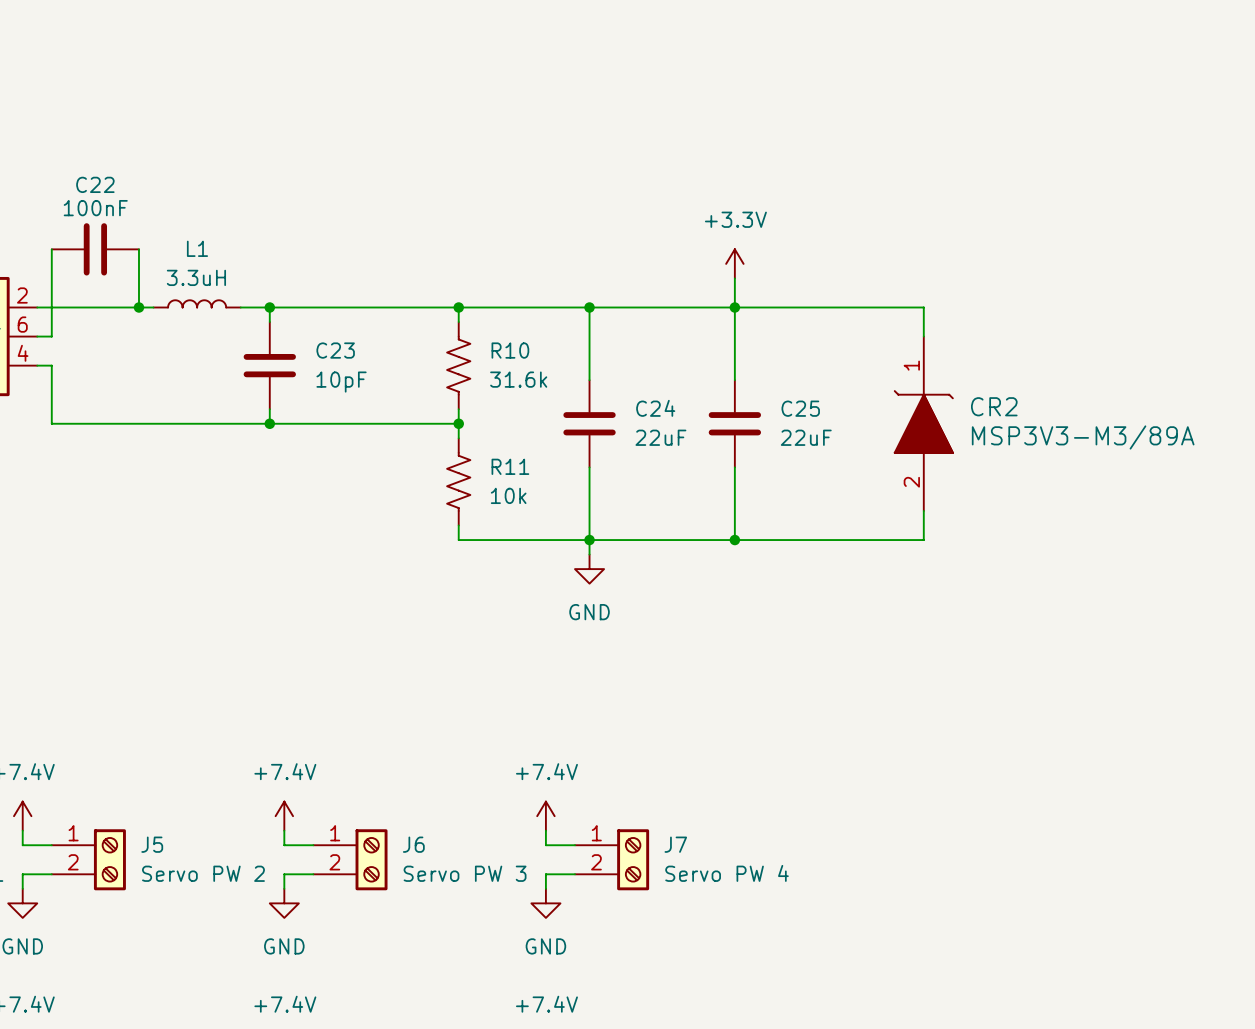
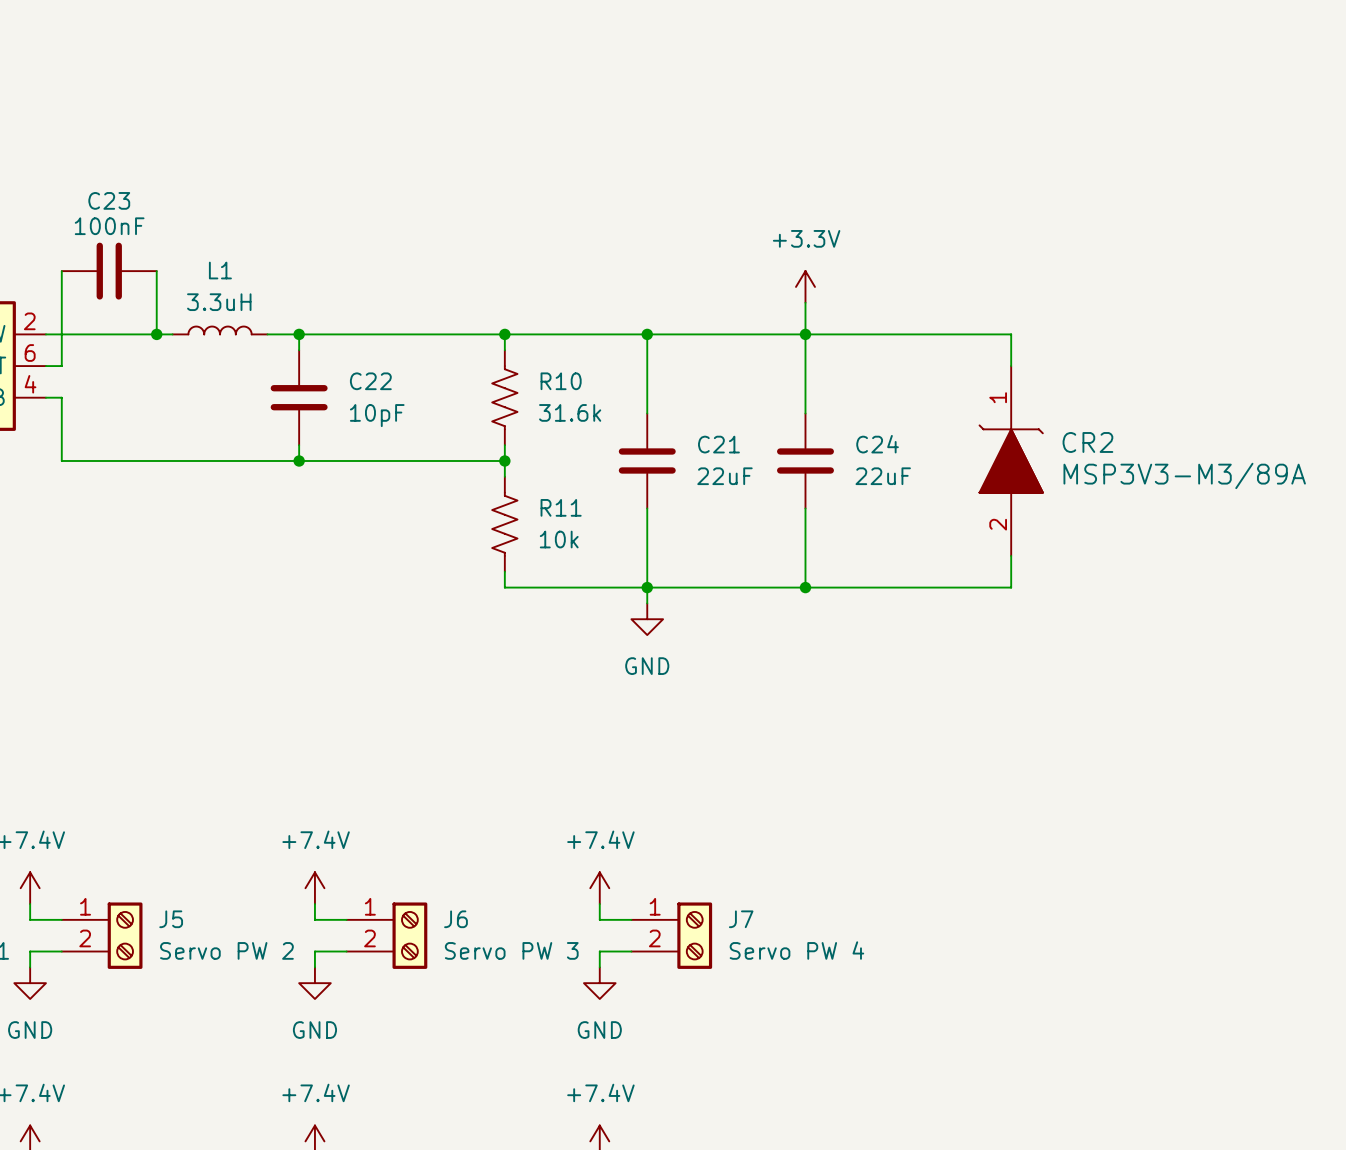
C22 name: C22 (95, 184) -> C23 (109, 200)
C23 name: C23 (335, 350) -> C22 (370, 381)
C24 name: C24 (655, 408) -> C21 (718, 444)
C25 name: C25 (800, 408) -> C24 (877, 444)

